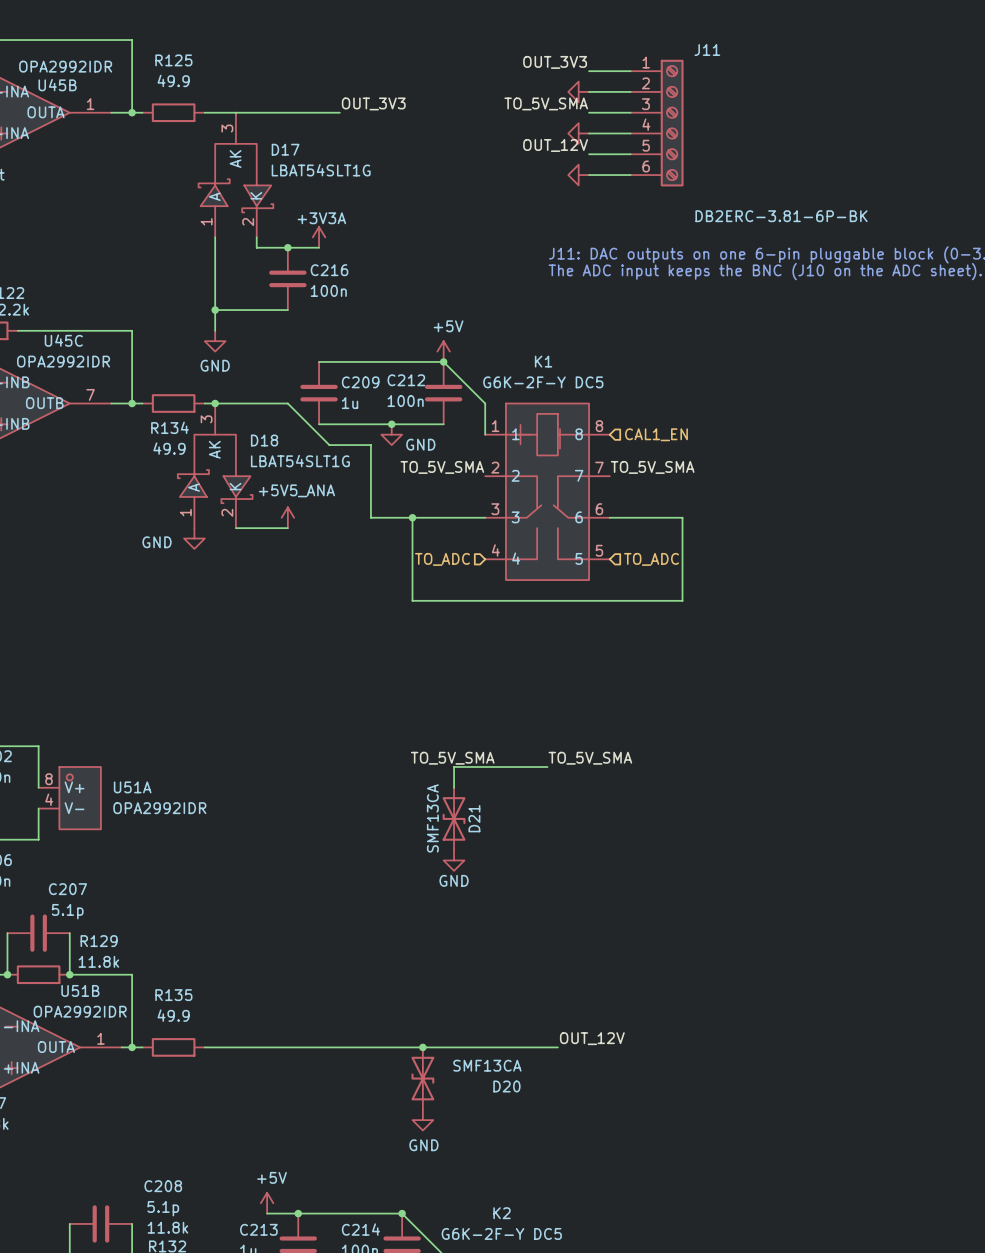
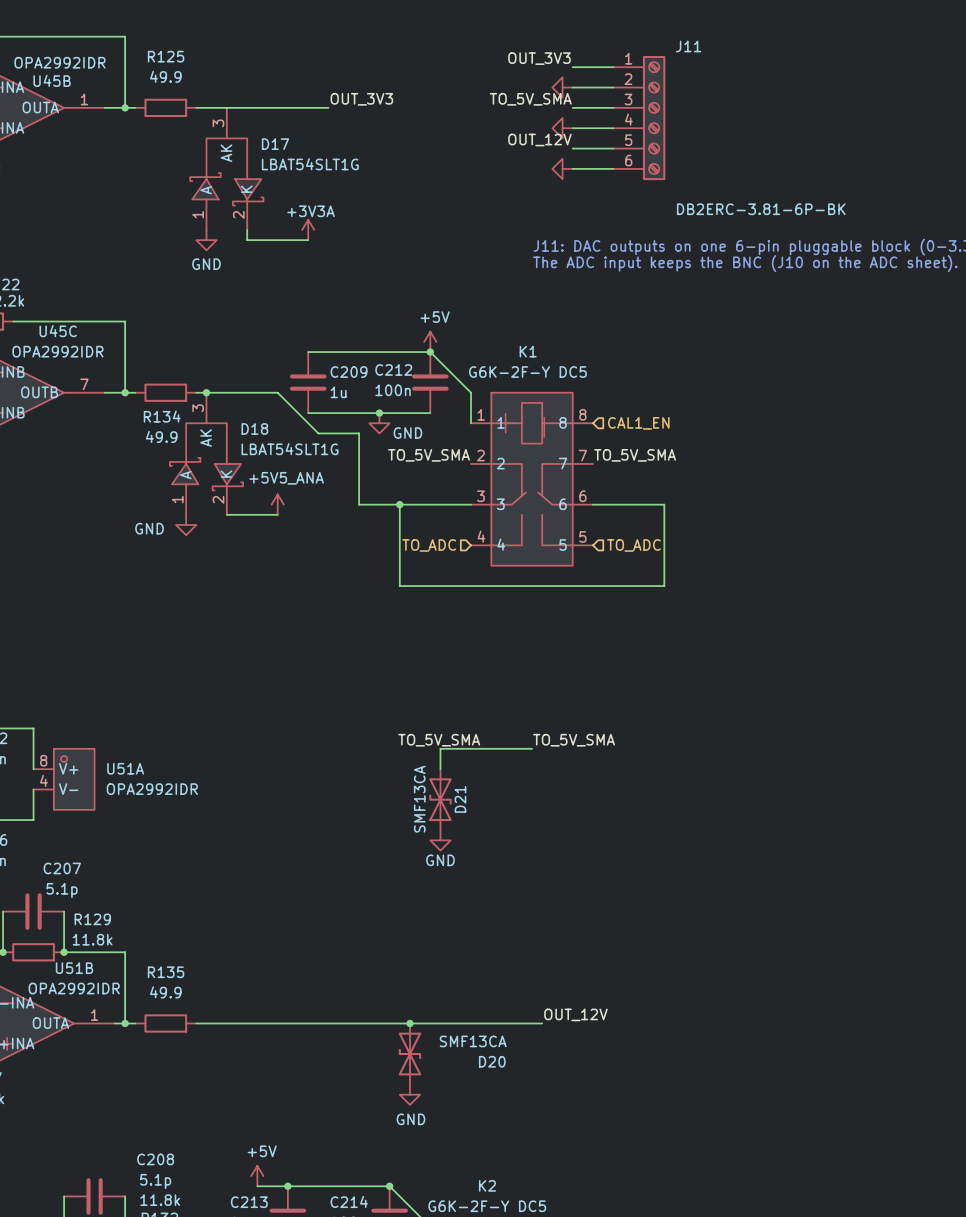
wire: (215, 237) (215, 330) -> none
junction: (287, 247) -> none
C216: 100n (287, 278) -> none
wire: (215, 310) (287, 310) -> none
junction: (215, 310) -> none
power symbol position: GND (215, 341) -> GND (206, 240)

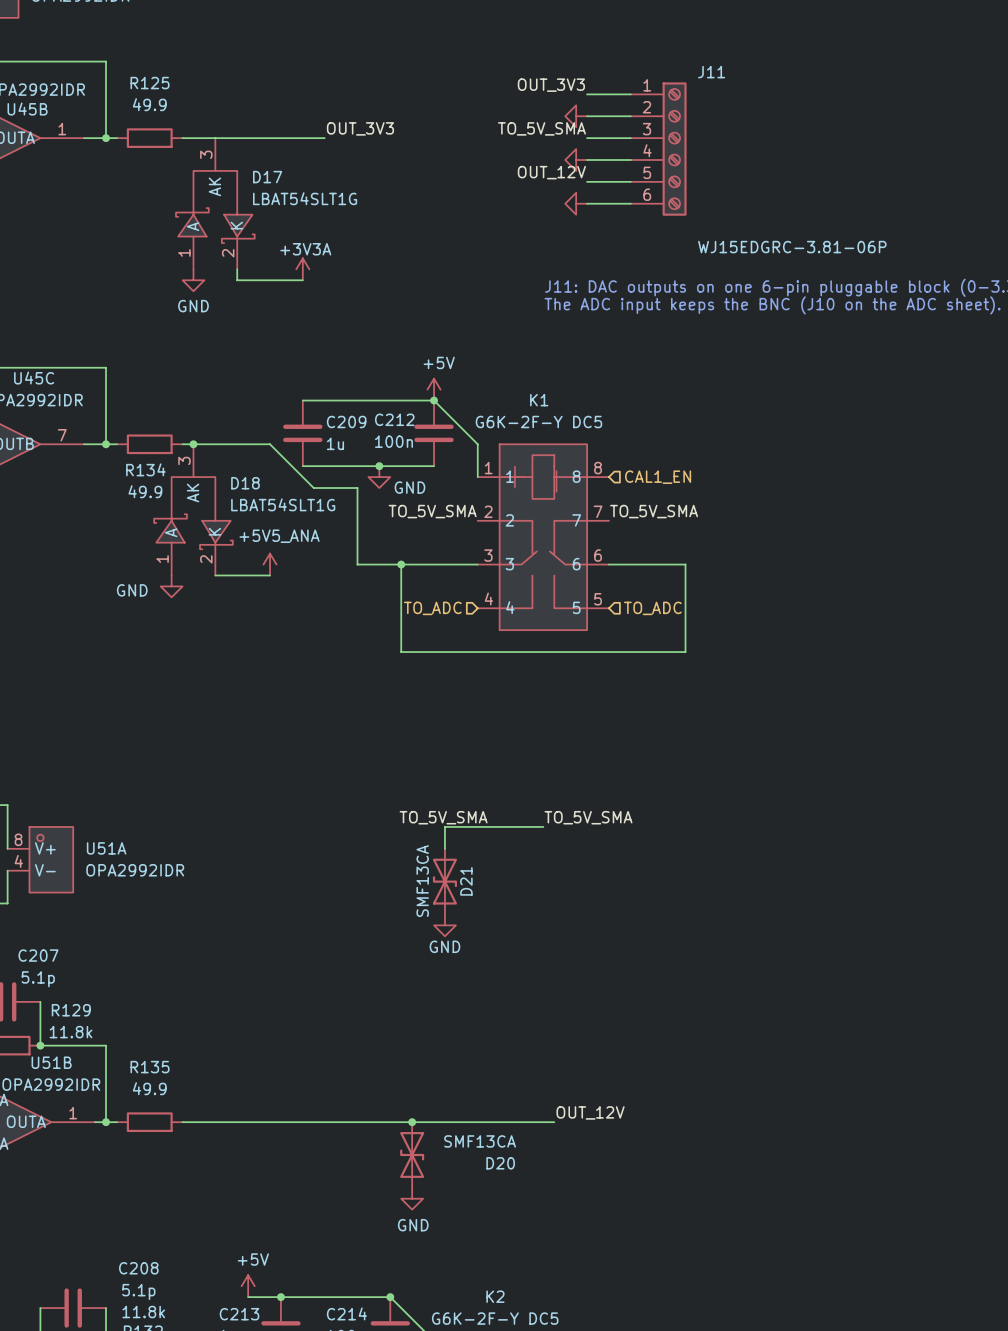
J11 value: DB2ERC-3.81-6P-BK (761, 209) -> WJ15EDGRC-3.81-06P (792, 247)

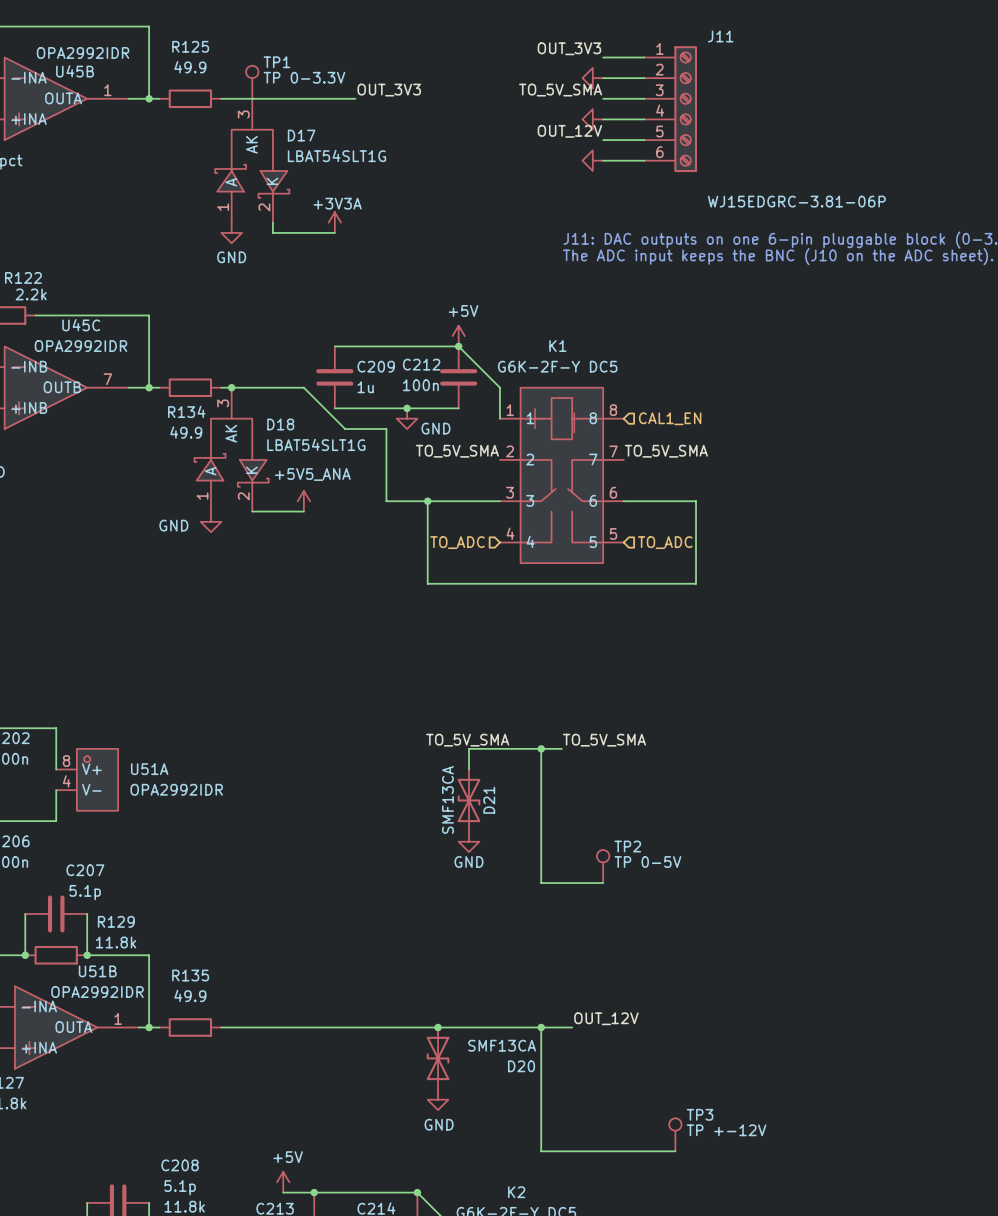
TP1: none -> TP 0-3.3V (252, 82)
wire: none -> (541, 748) (541, 883) (603, 883)
junction: none -> (541, 748)
TP2: none -> TP 0-5V (603, 866)
wire: none -> (541, 1027) (541, 1151) (675, 1151)
junction: none -> (541, 1027)
TP3: none -> TP +-12V (675, 1134)

